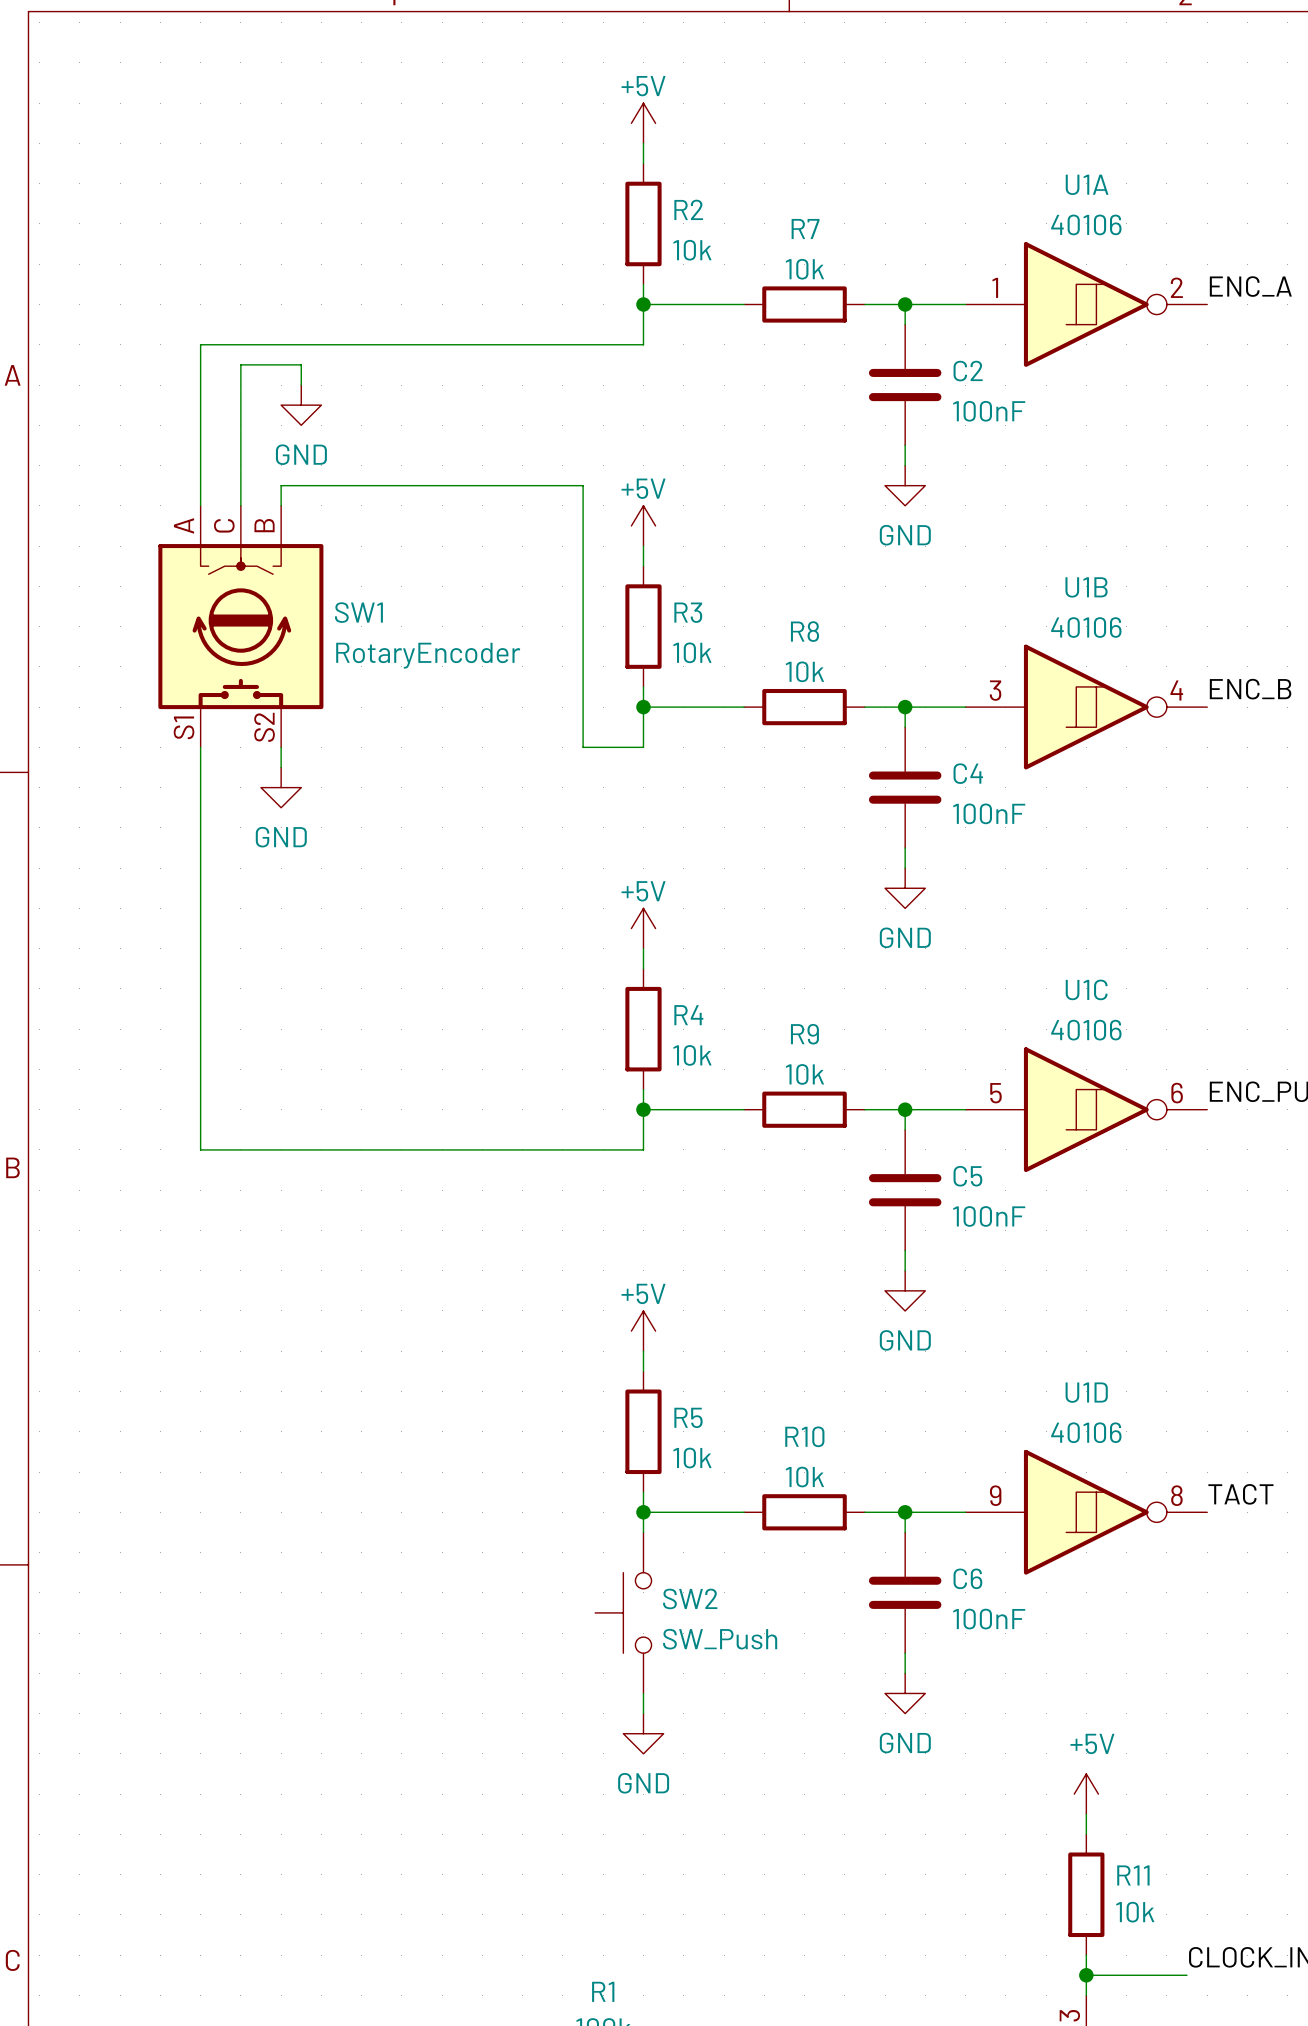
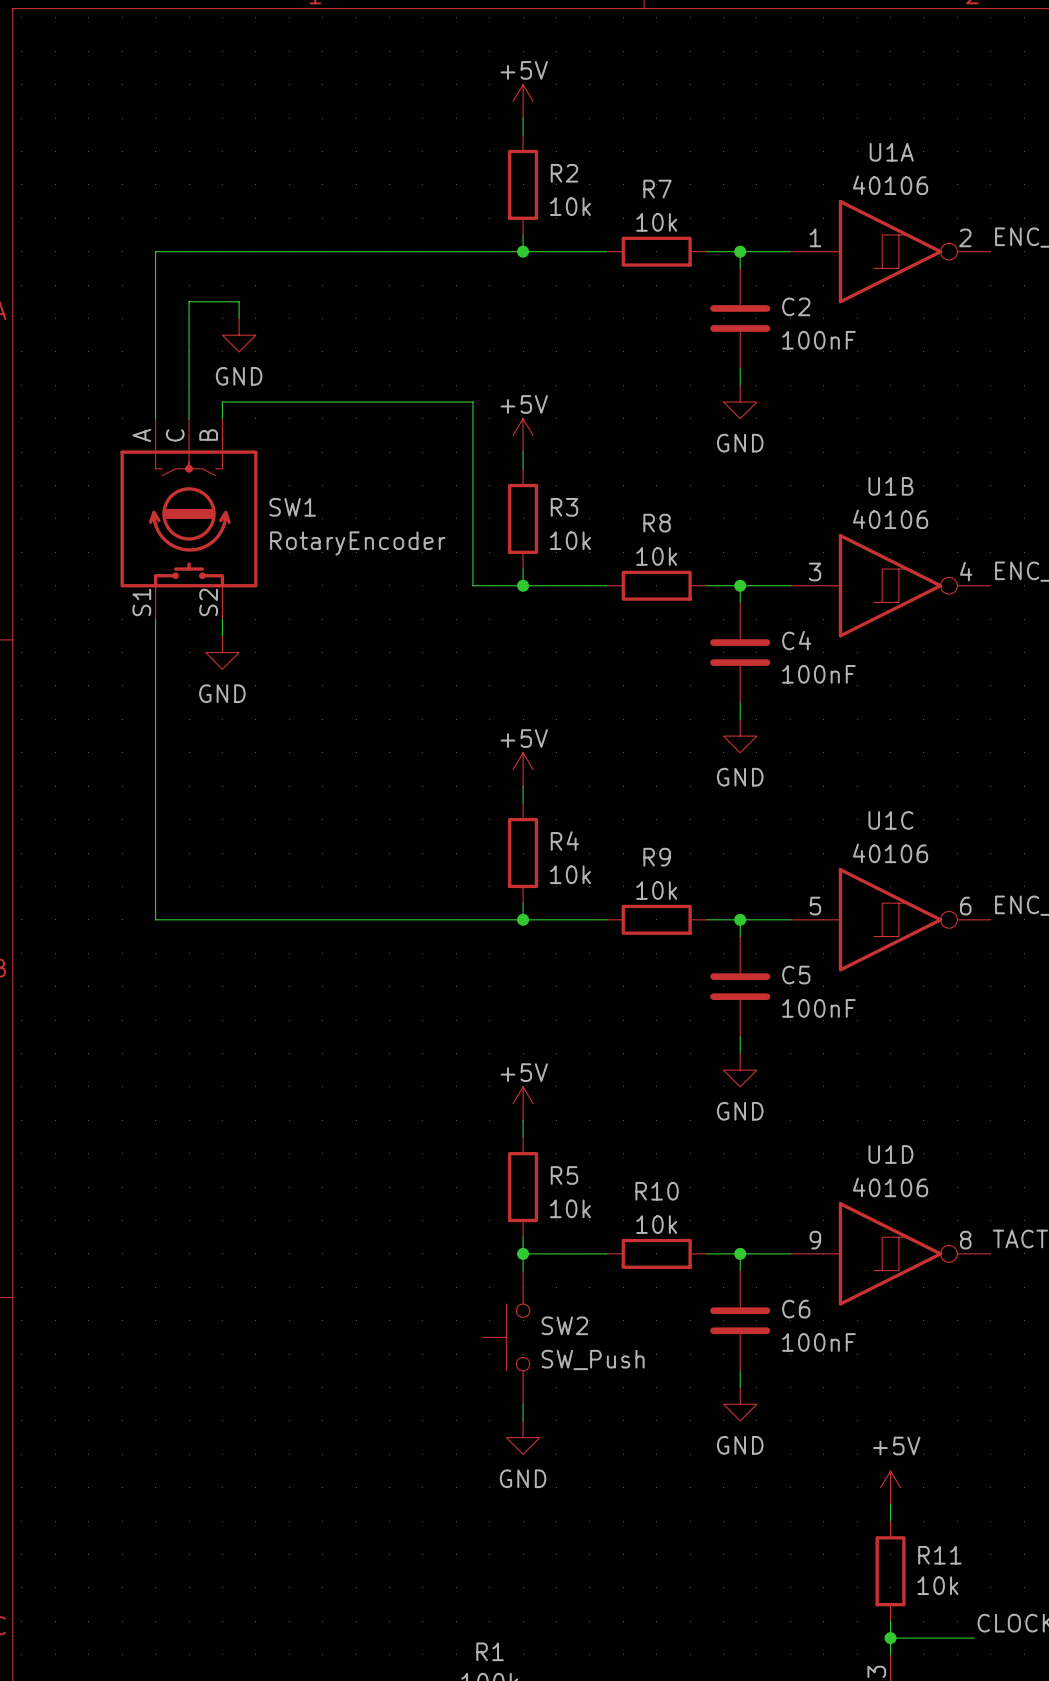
wire: (643, 304) (643, 344) (200, 344) -> (523, 251) (155, 251) (155, 285)
wire: (583, 707) (583, 747) (643, 747) (643, 707) -> (472, 585) (523, 585)
wire: (200, 1109) (200, 1149) (643, 1149) (643, 1109) -> (155, 919) (523, 919)

